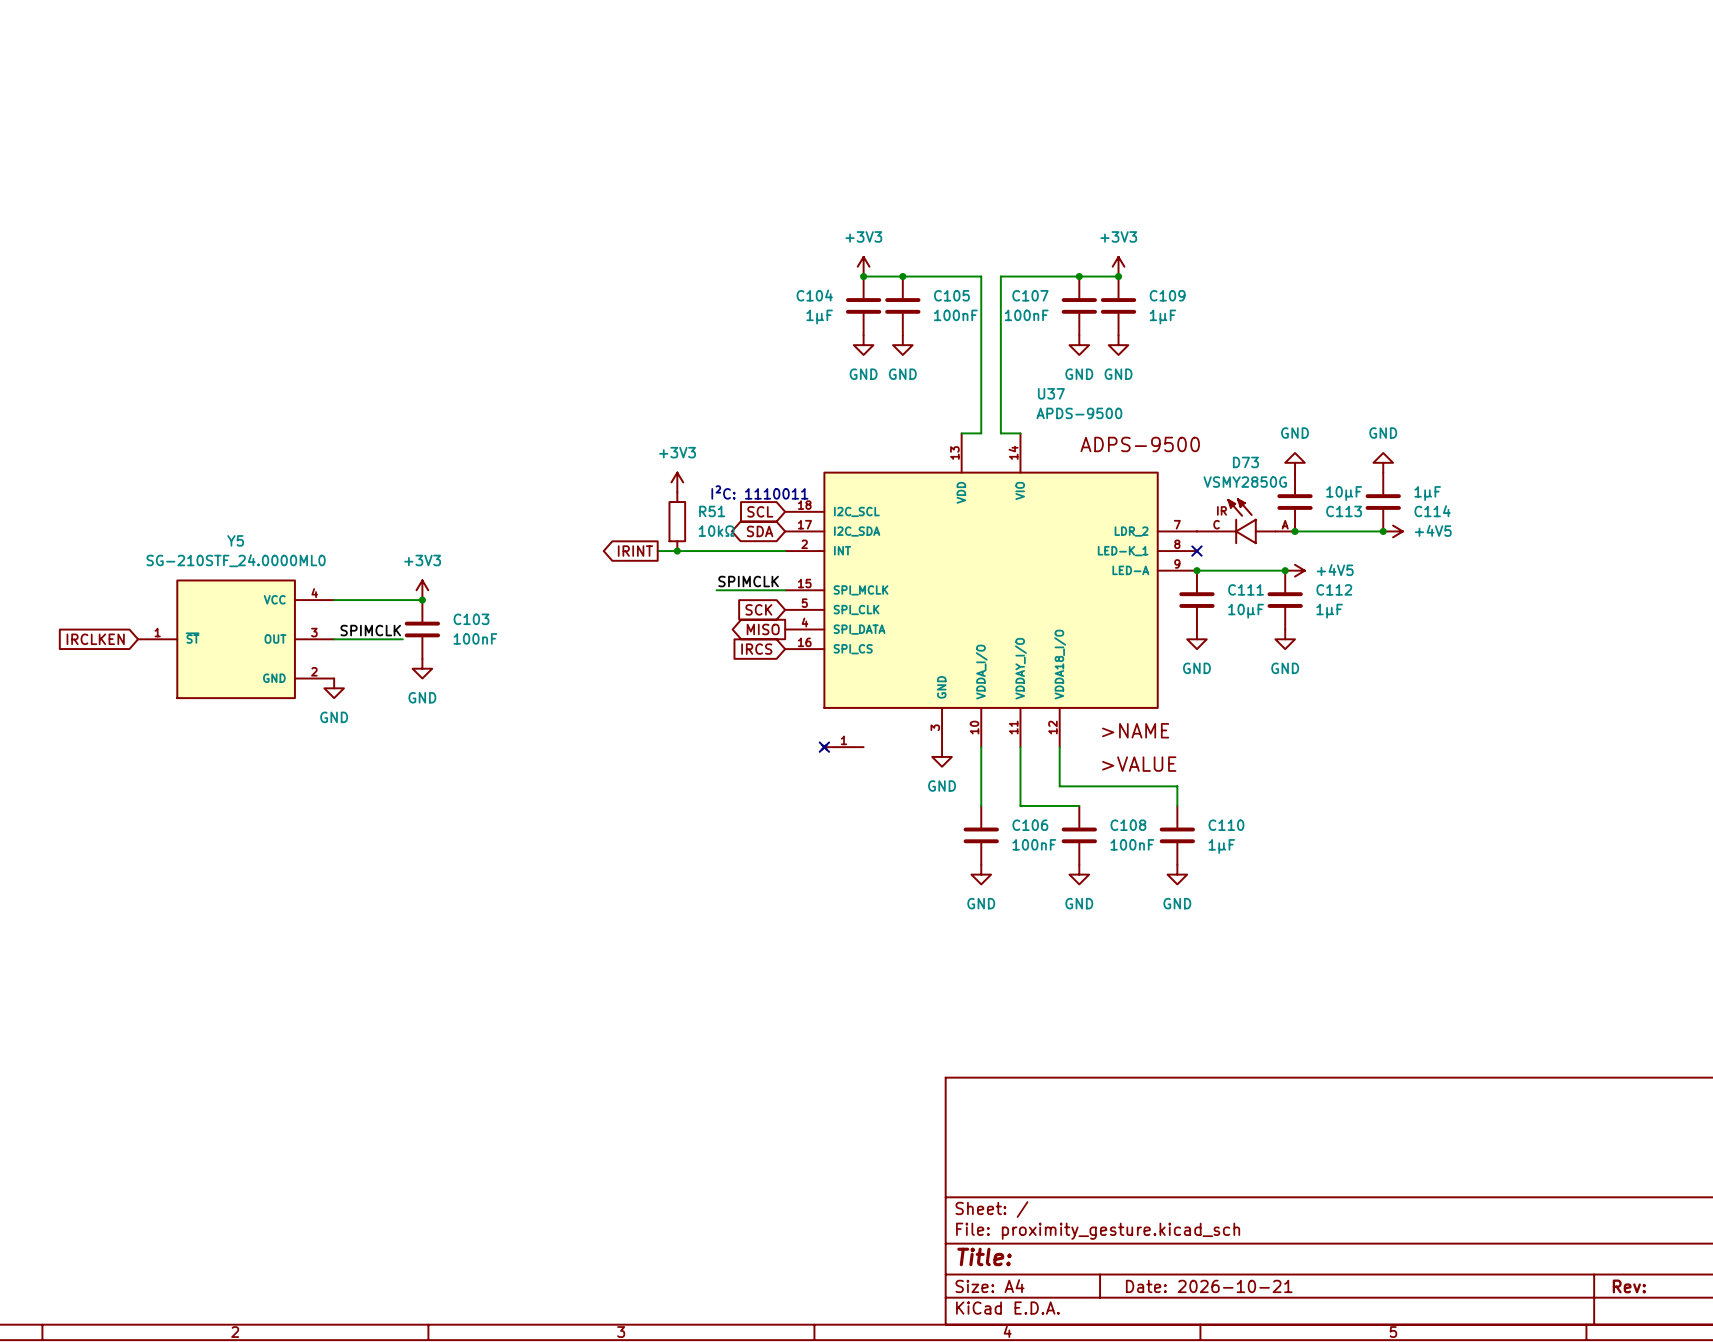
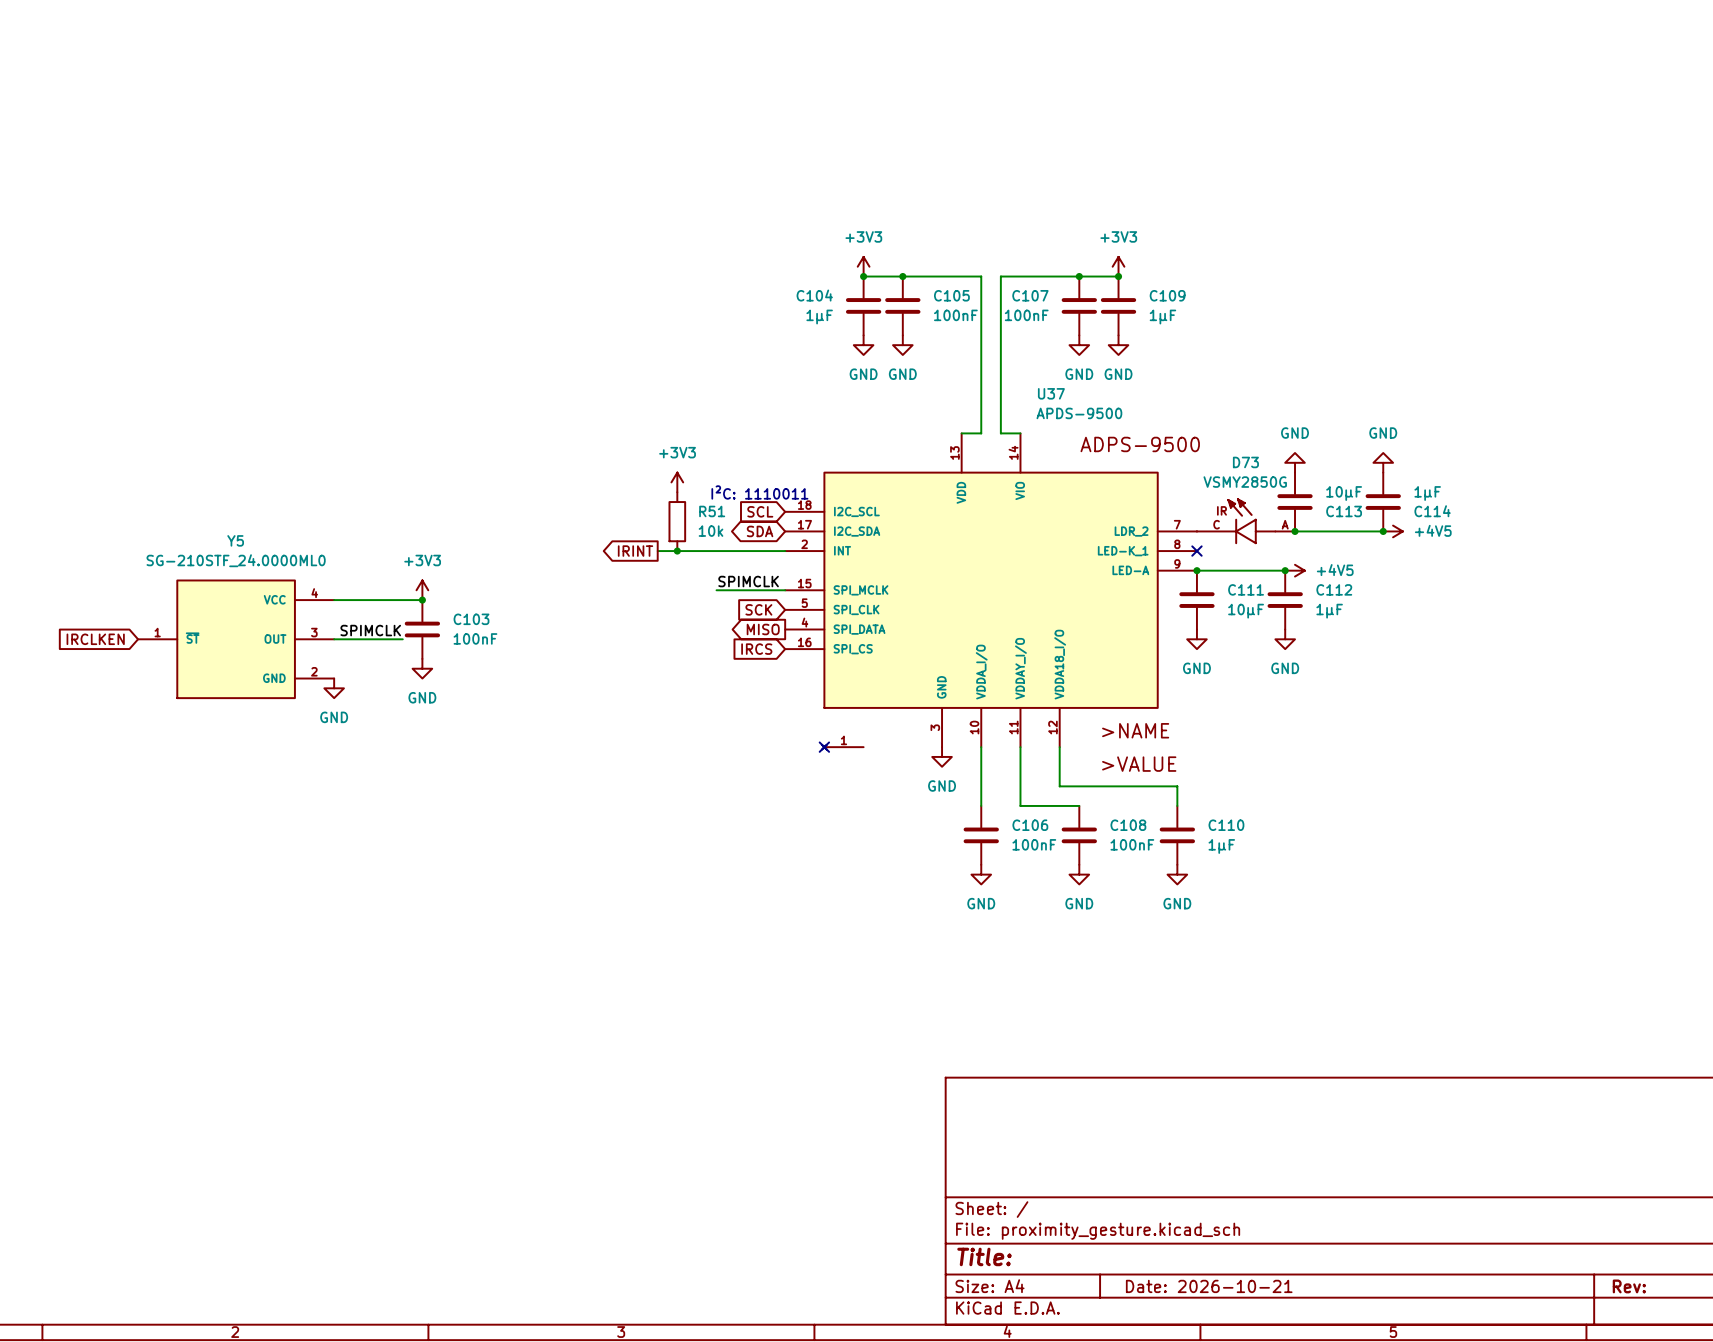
R51 value: 10kΩ (716, 531) -> 10k (711, 531)

